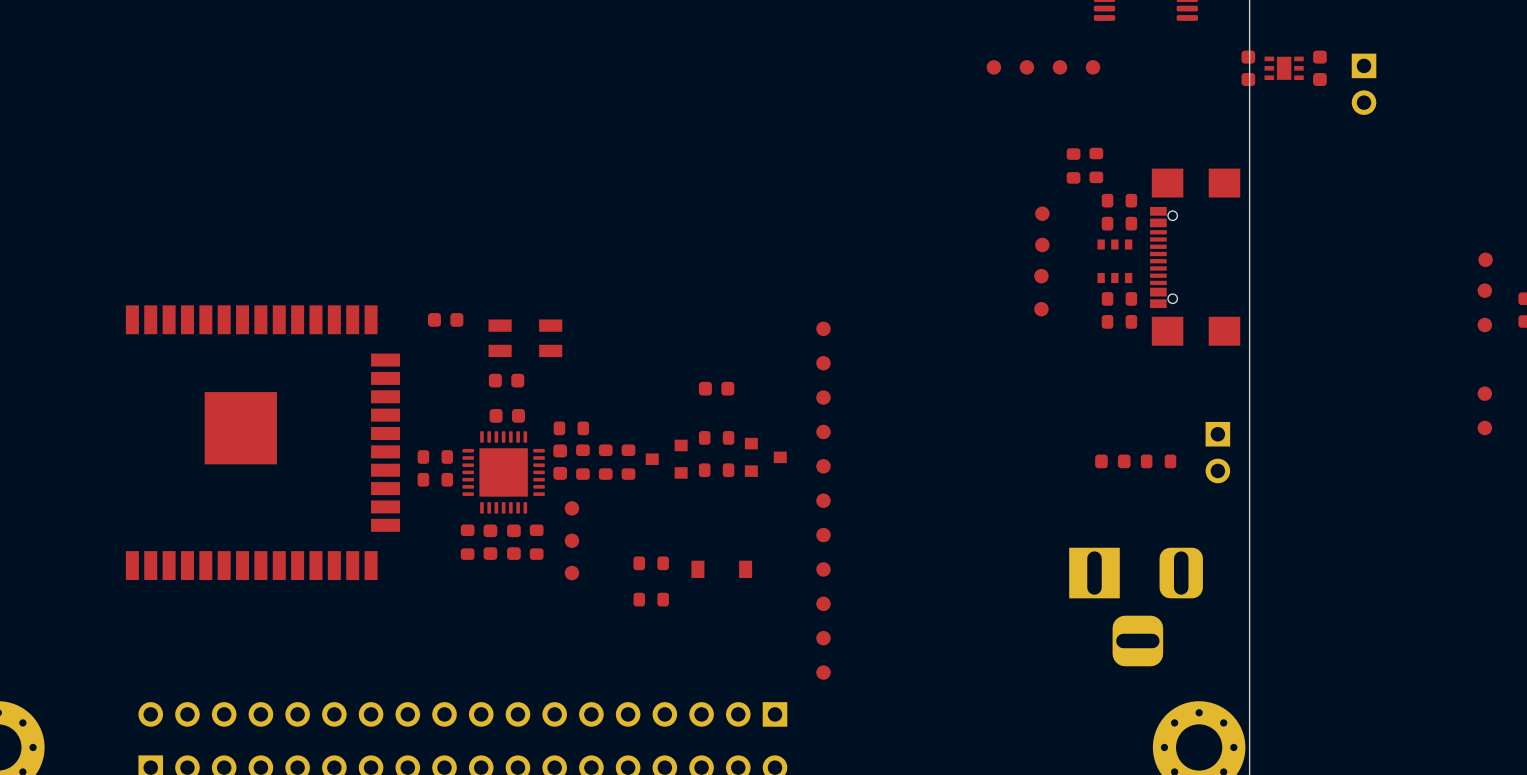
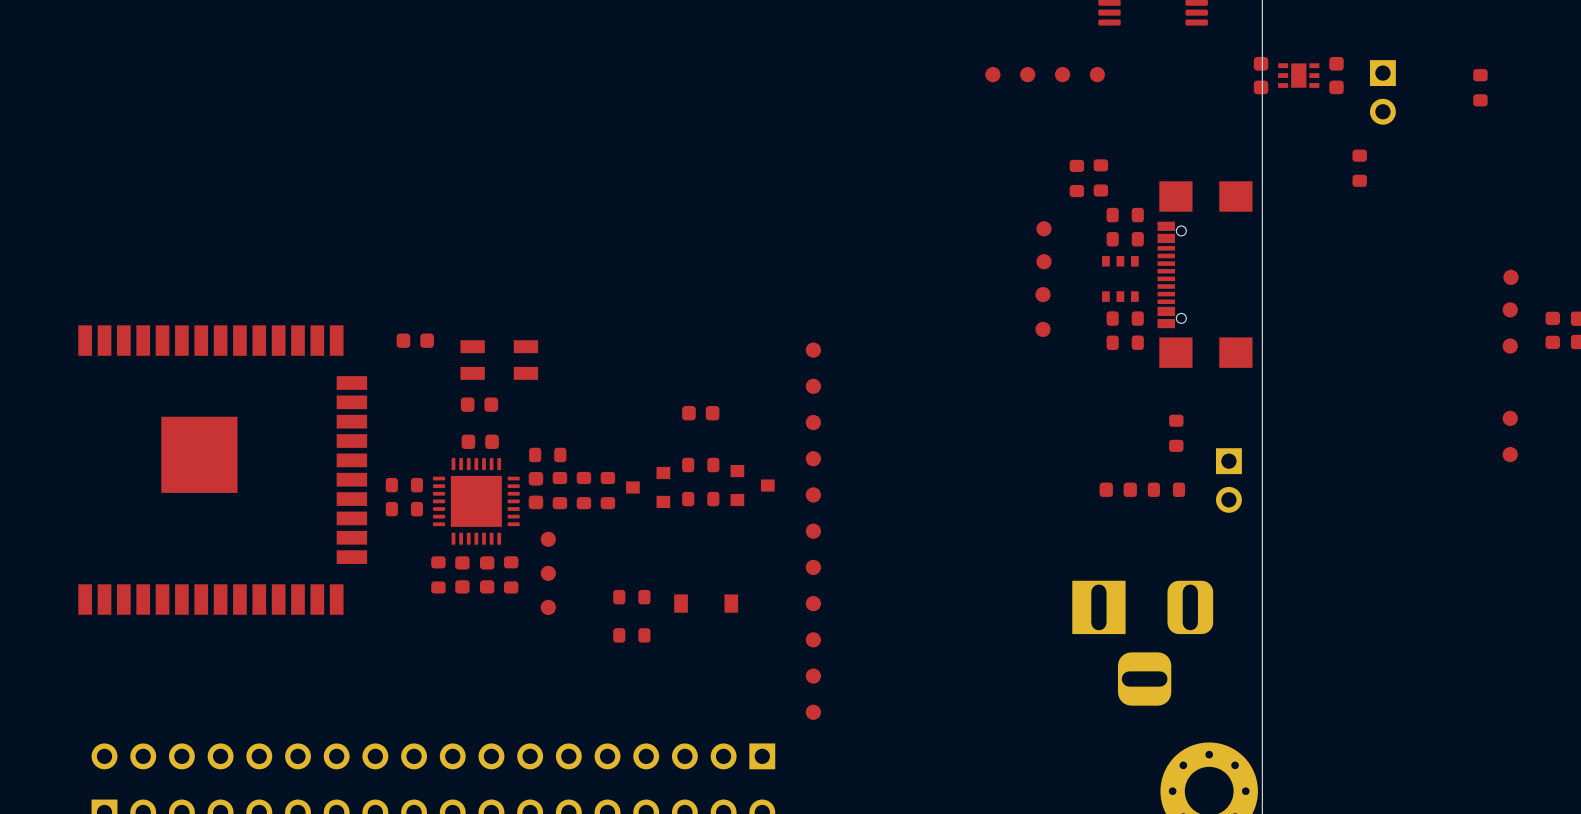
part: none -> (1480, 87)
part: none -> (1359, 168)
part: none -> (1176, 433)

